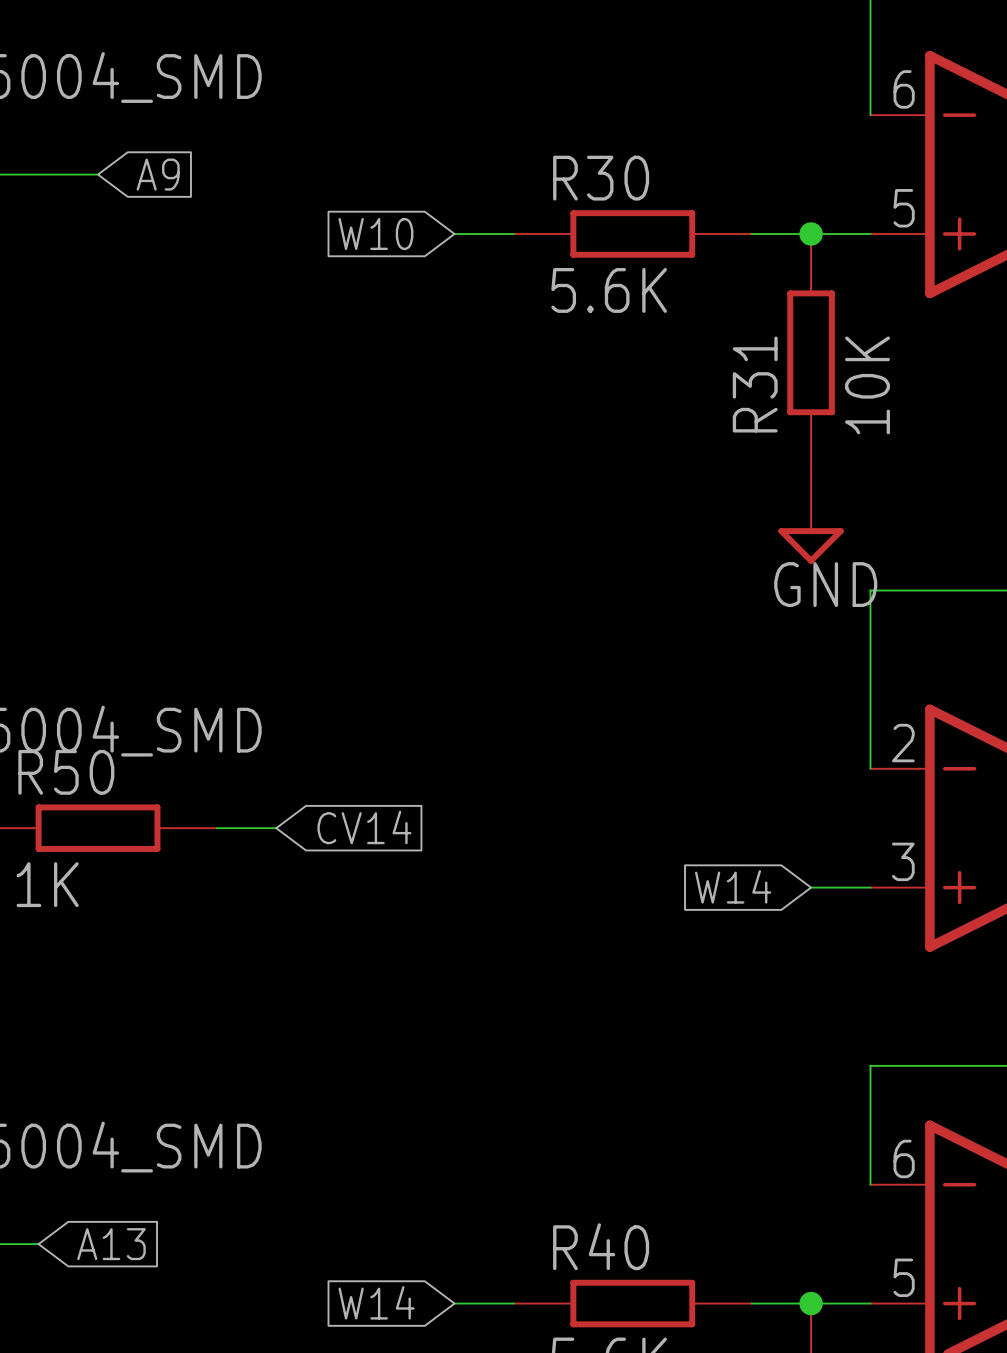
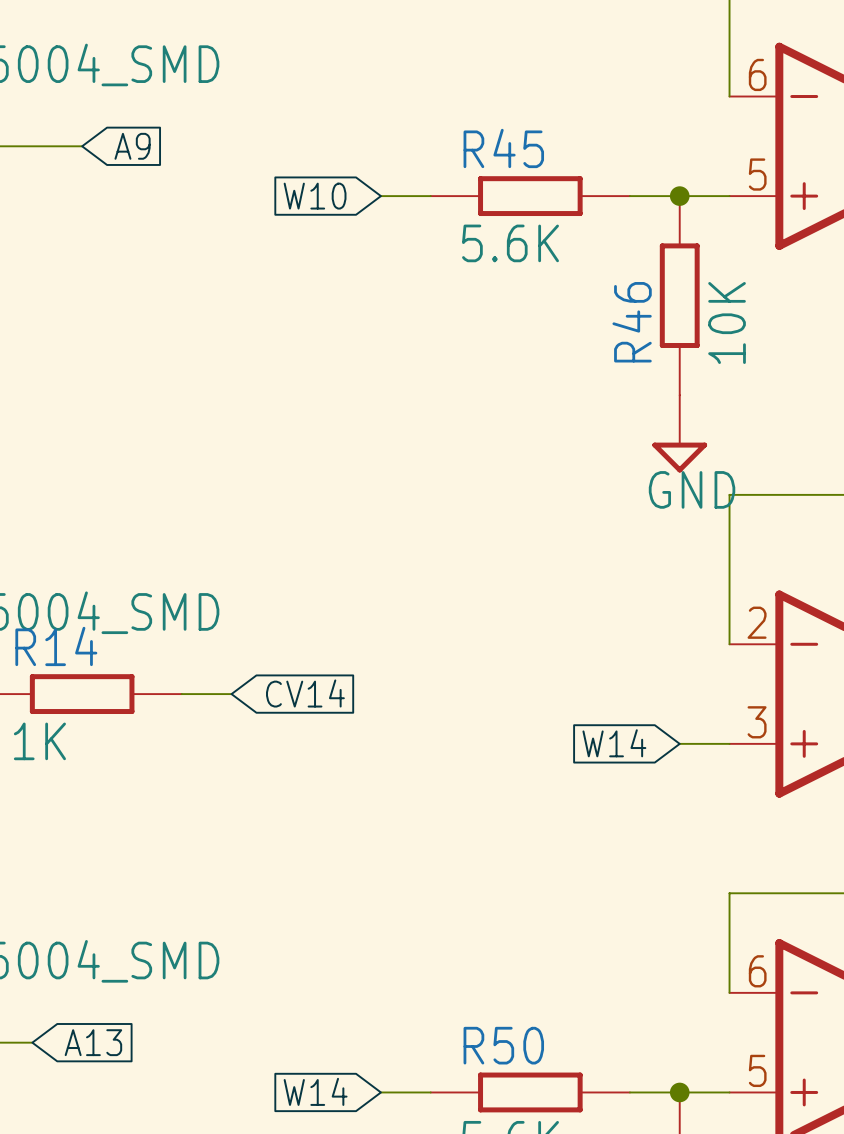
R30 name: R30 (601, 178) -> R45 (503, 148)
R31 name: R31 (755, 384) -> R46 (632, 322)
R50 name: R50 (66, 772) -> R14 (56, 646)
R40 name: R40 (601, 1246) -> R50 (503, 1045)

